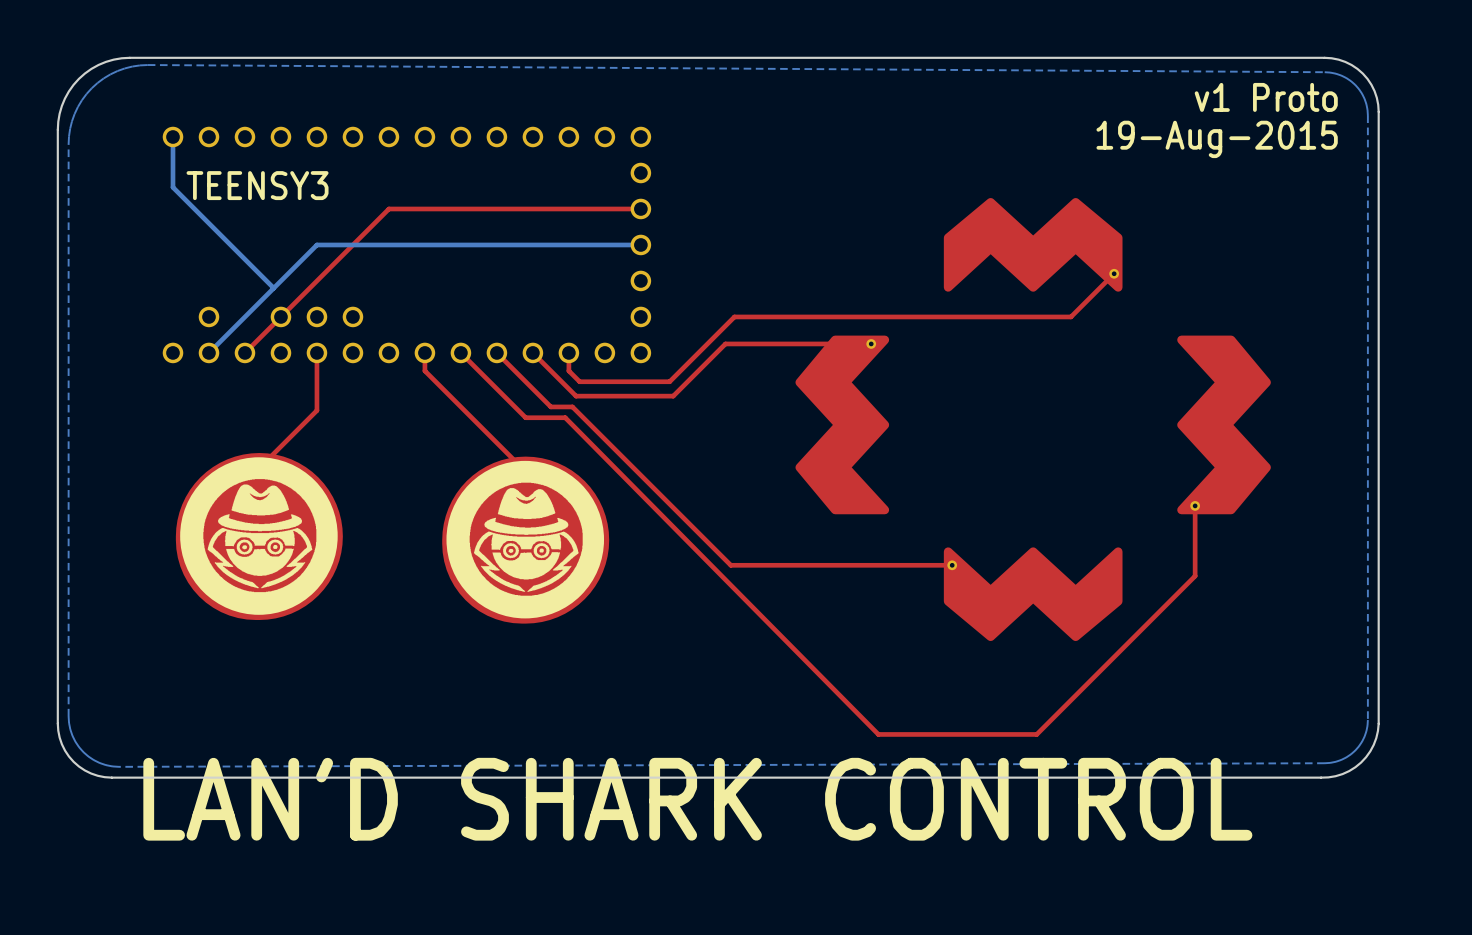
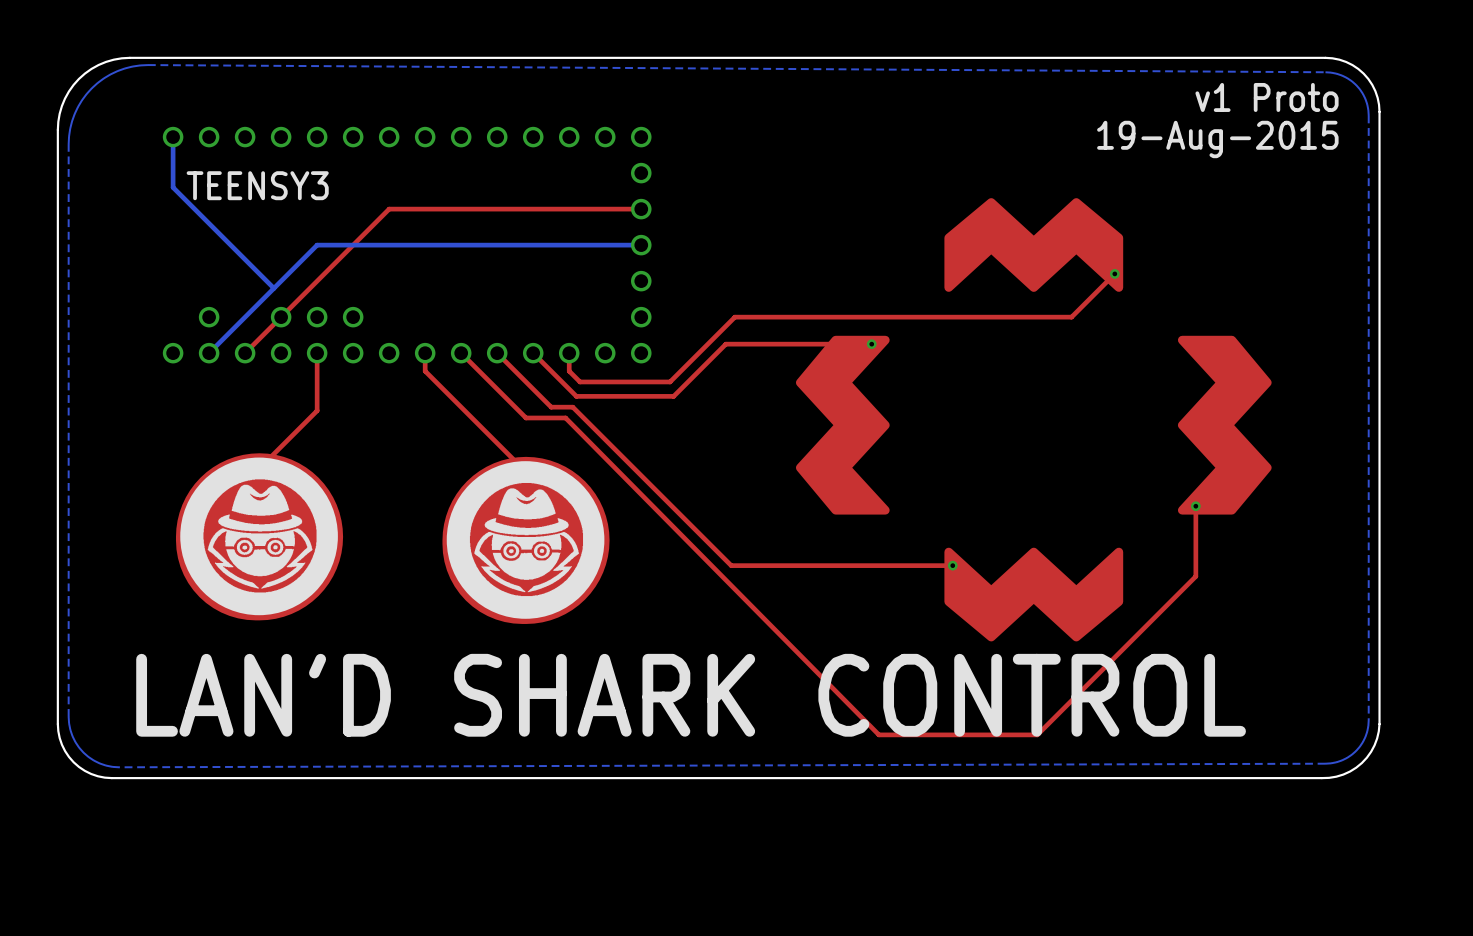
text position: LAN'D SHARK CONTROL (697, 799) -> LAN'D SHARK CONTROL (691, 695)

